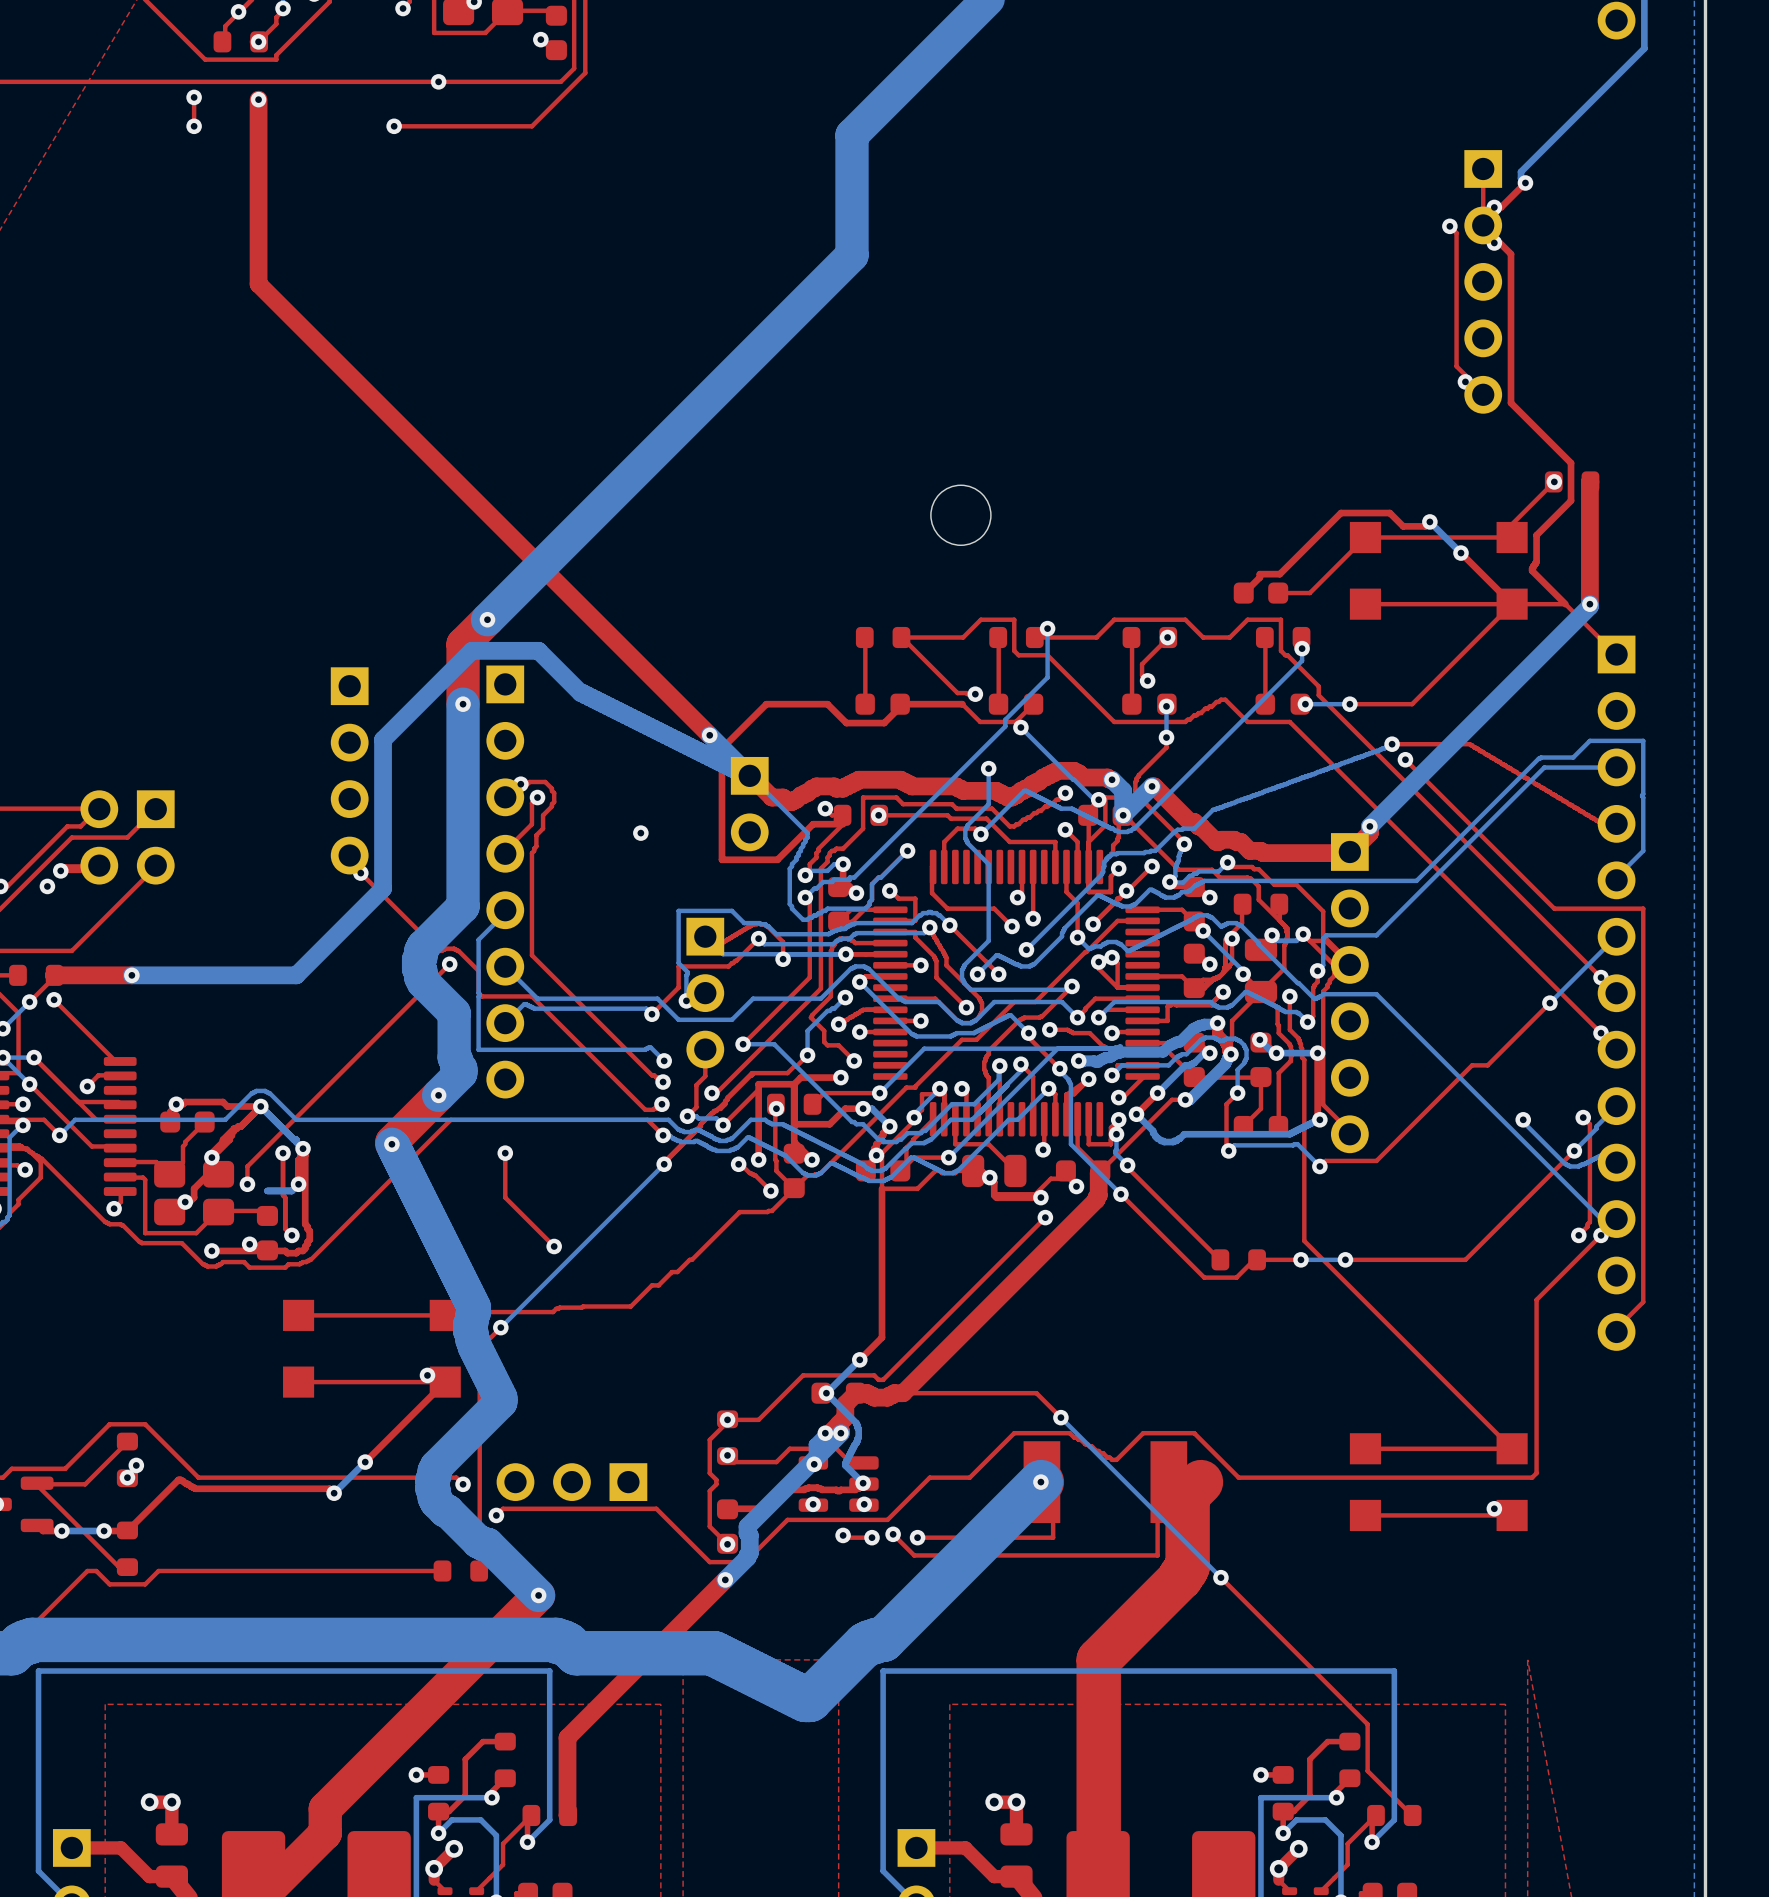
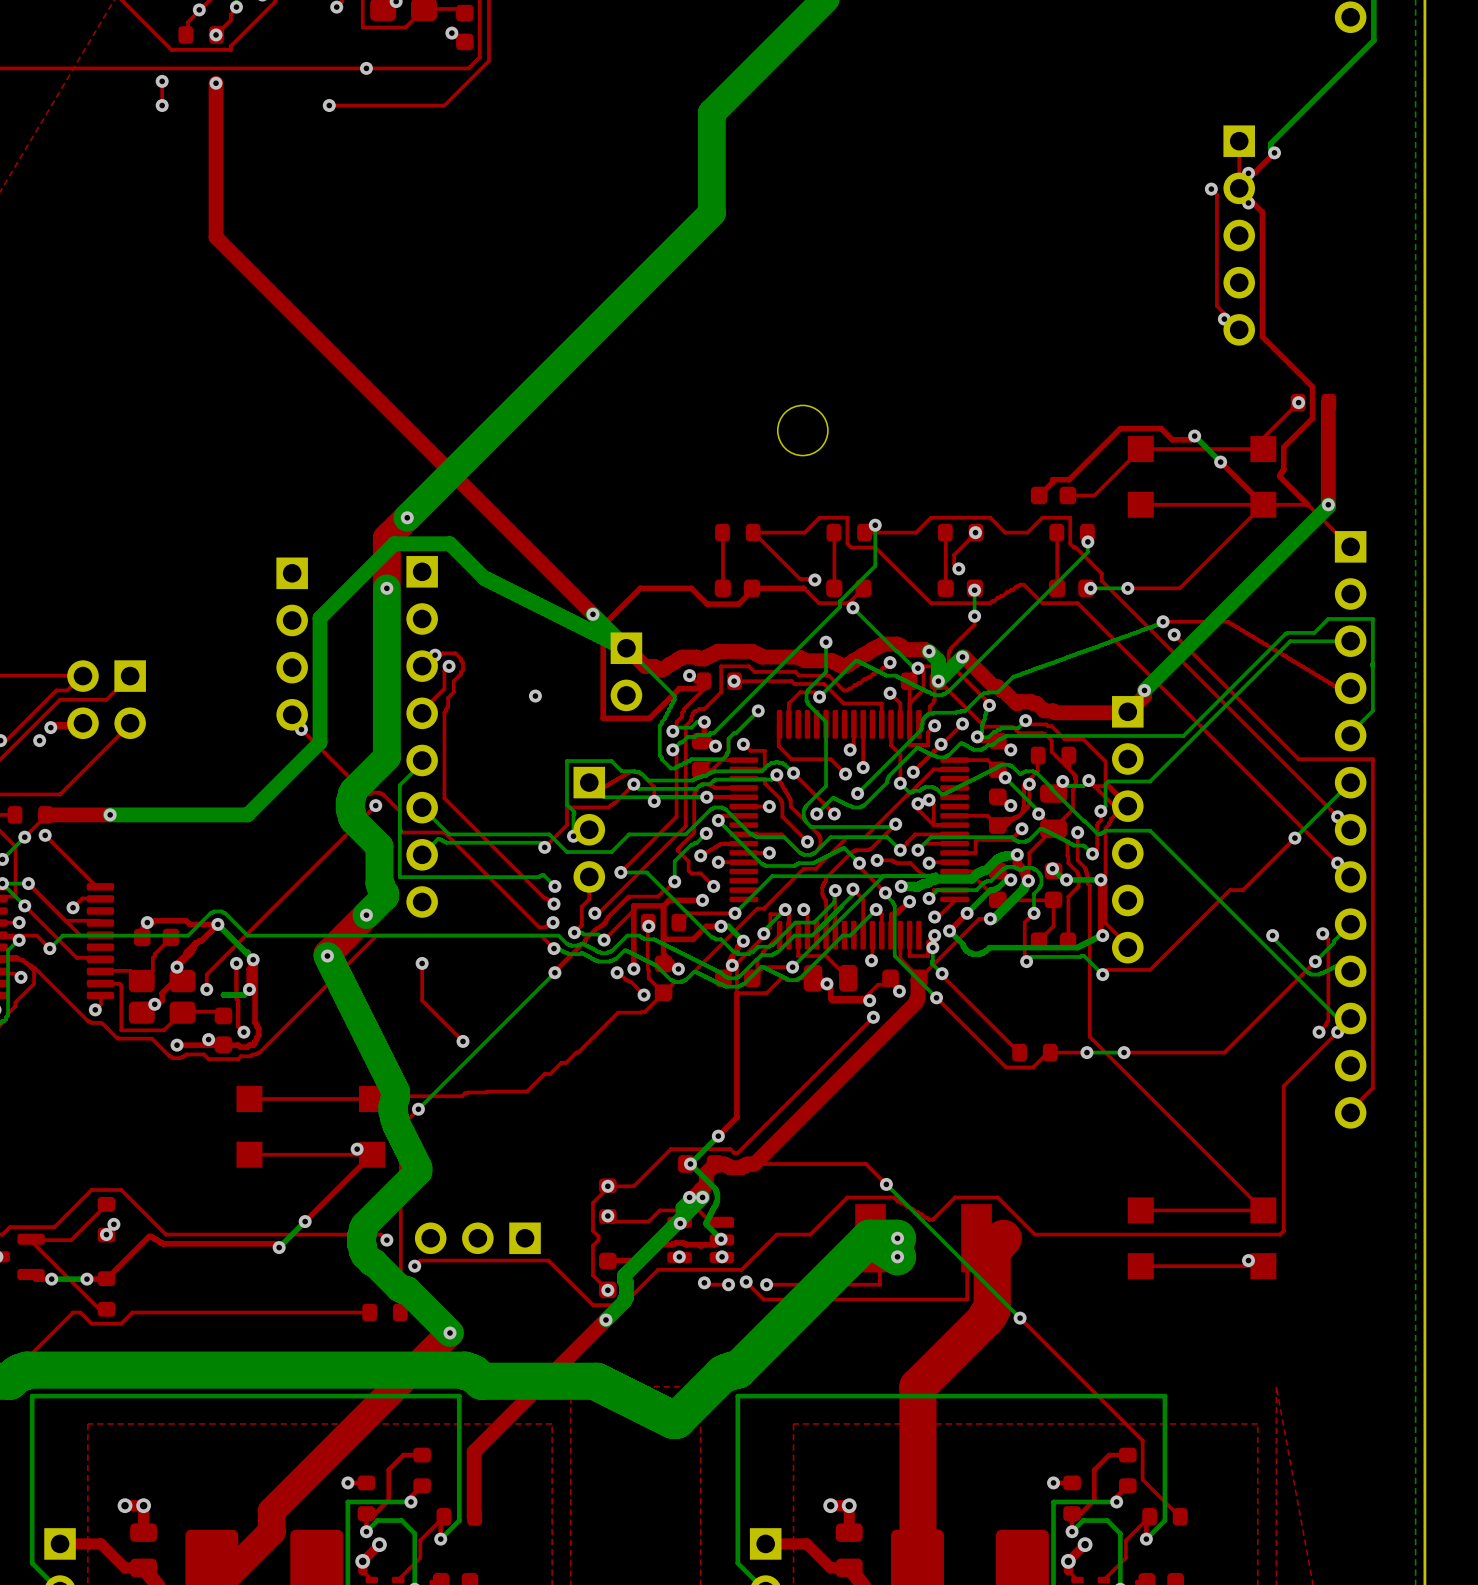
via: (1040, 1482) -> none
bottom track: none -> (897, 1238) (869, 1238) (897, 1256)
via: none -> (897, 1238)
via: none -> (897, 1256)

